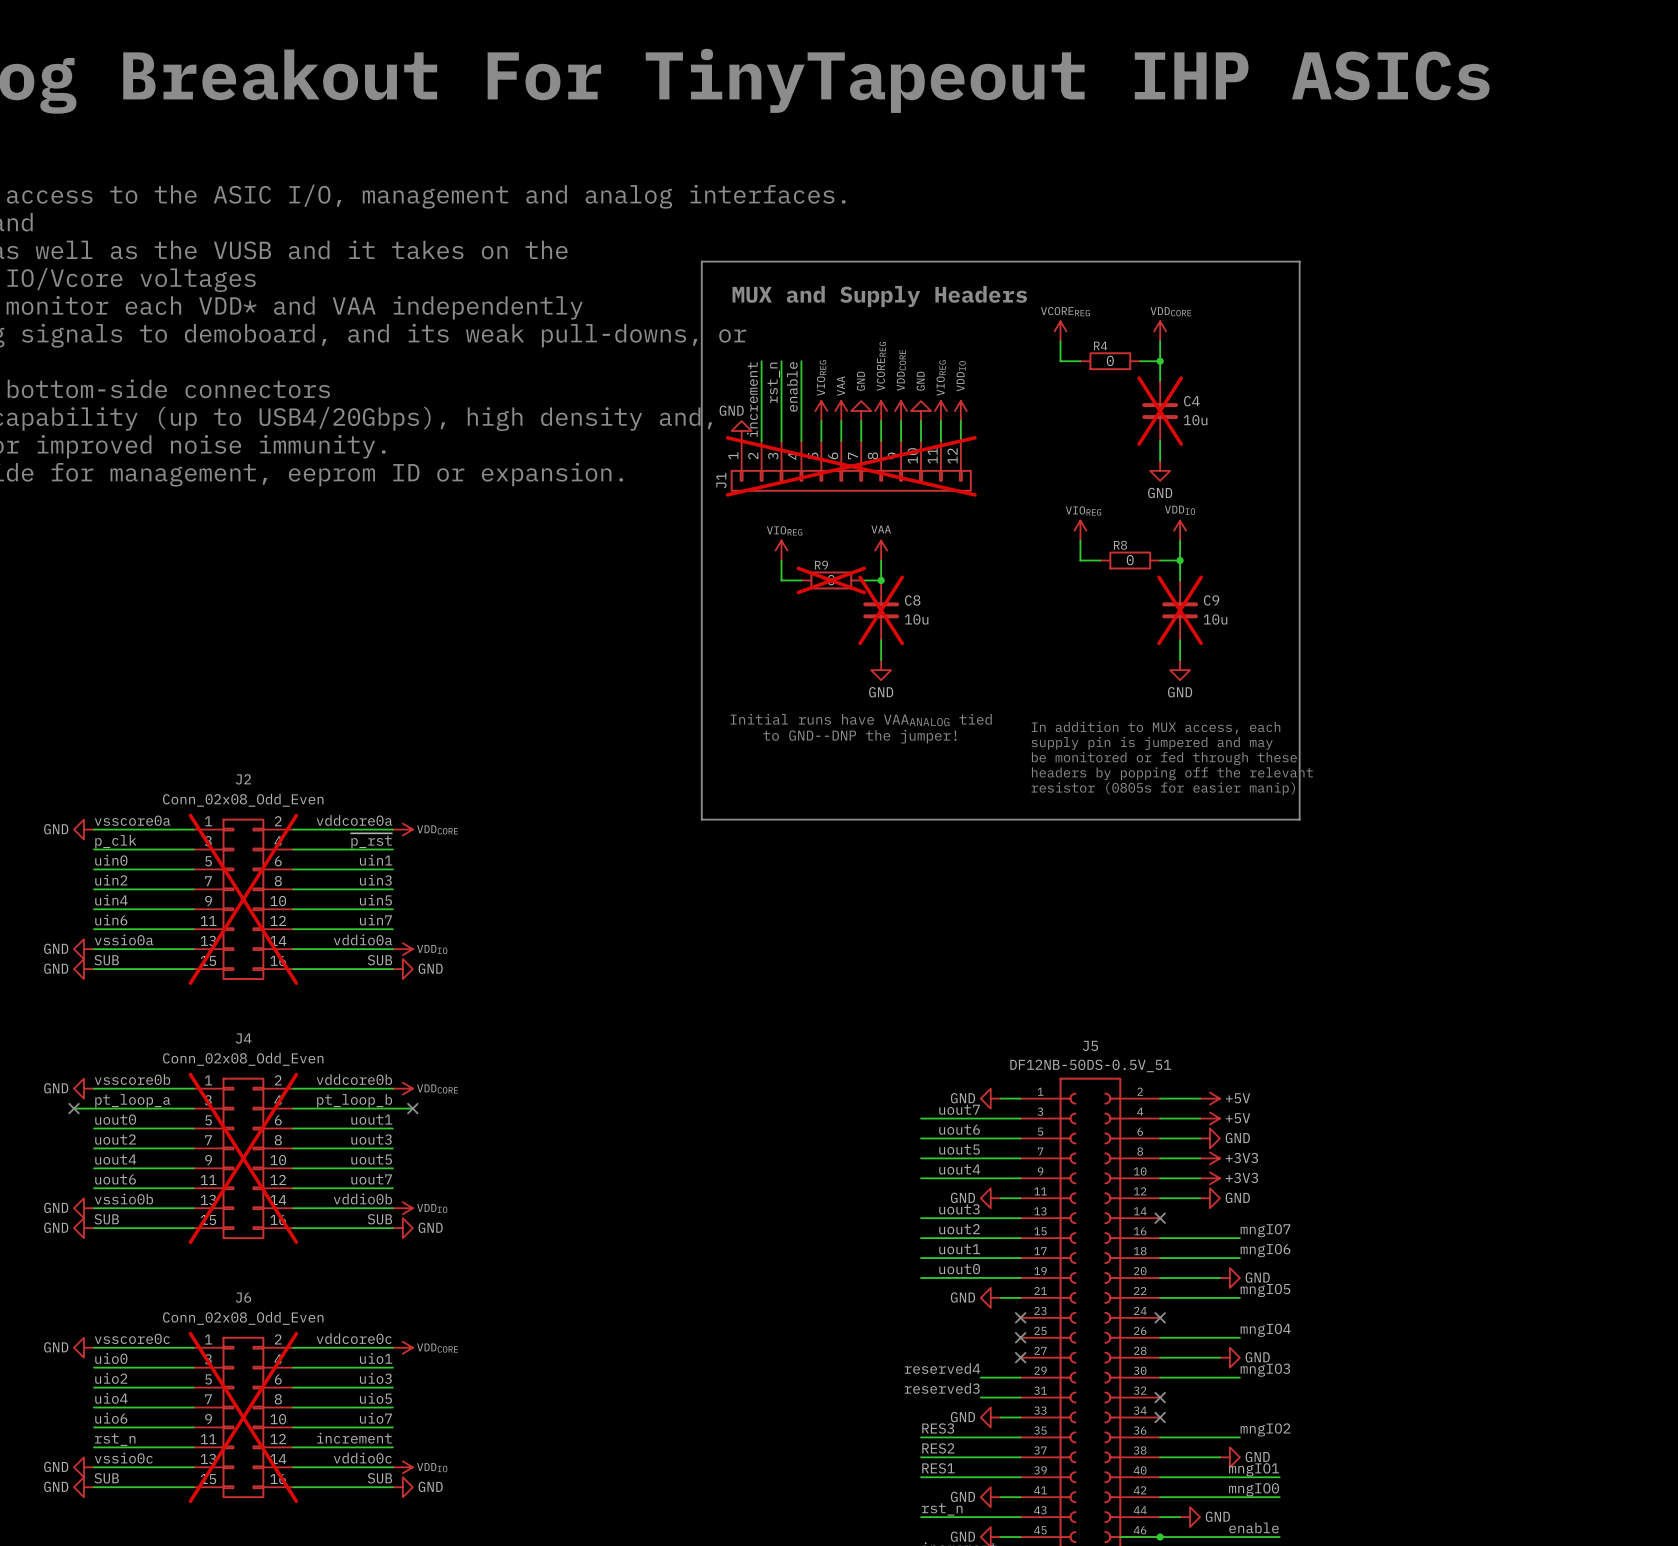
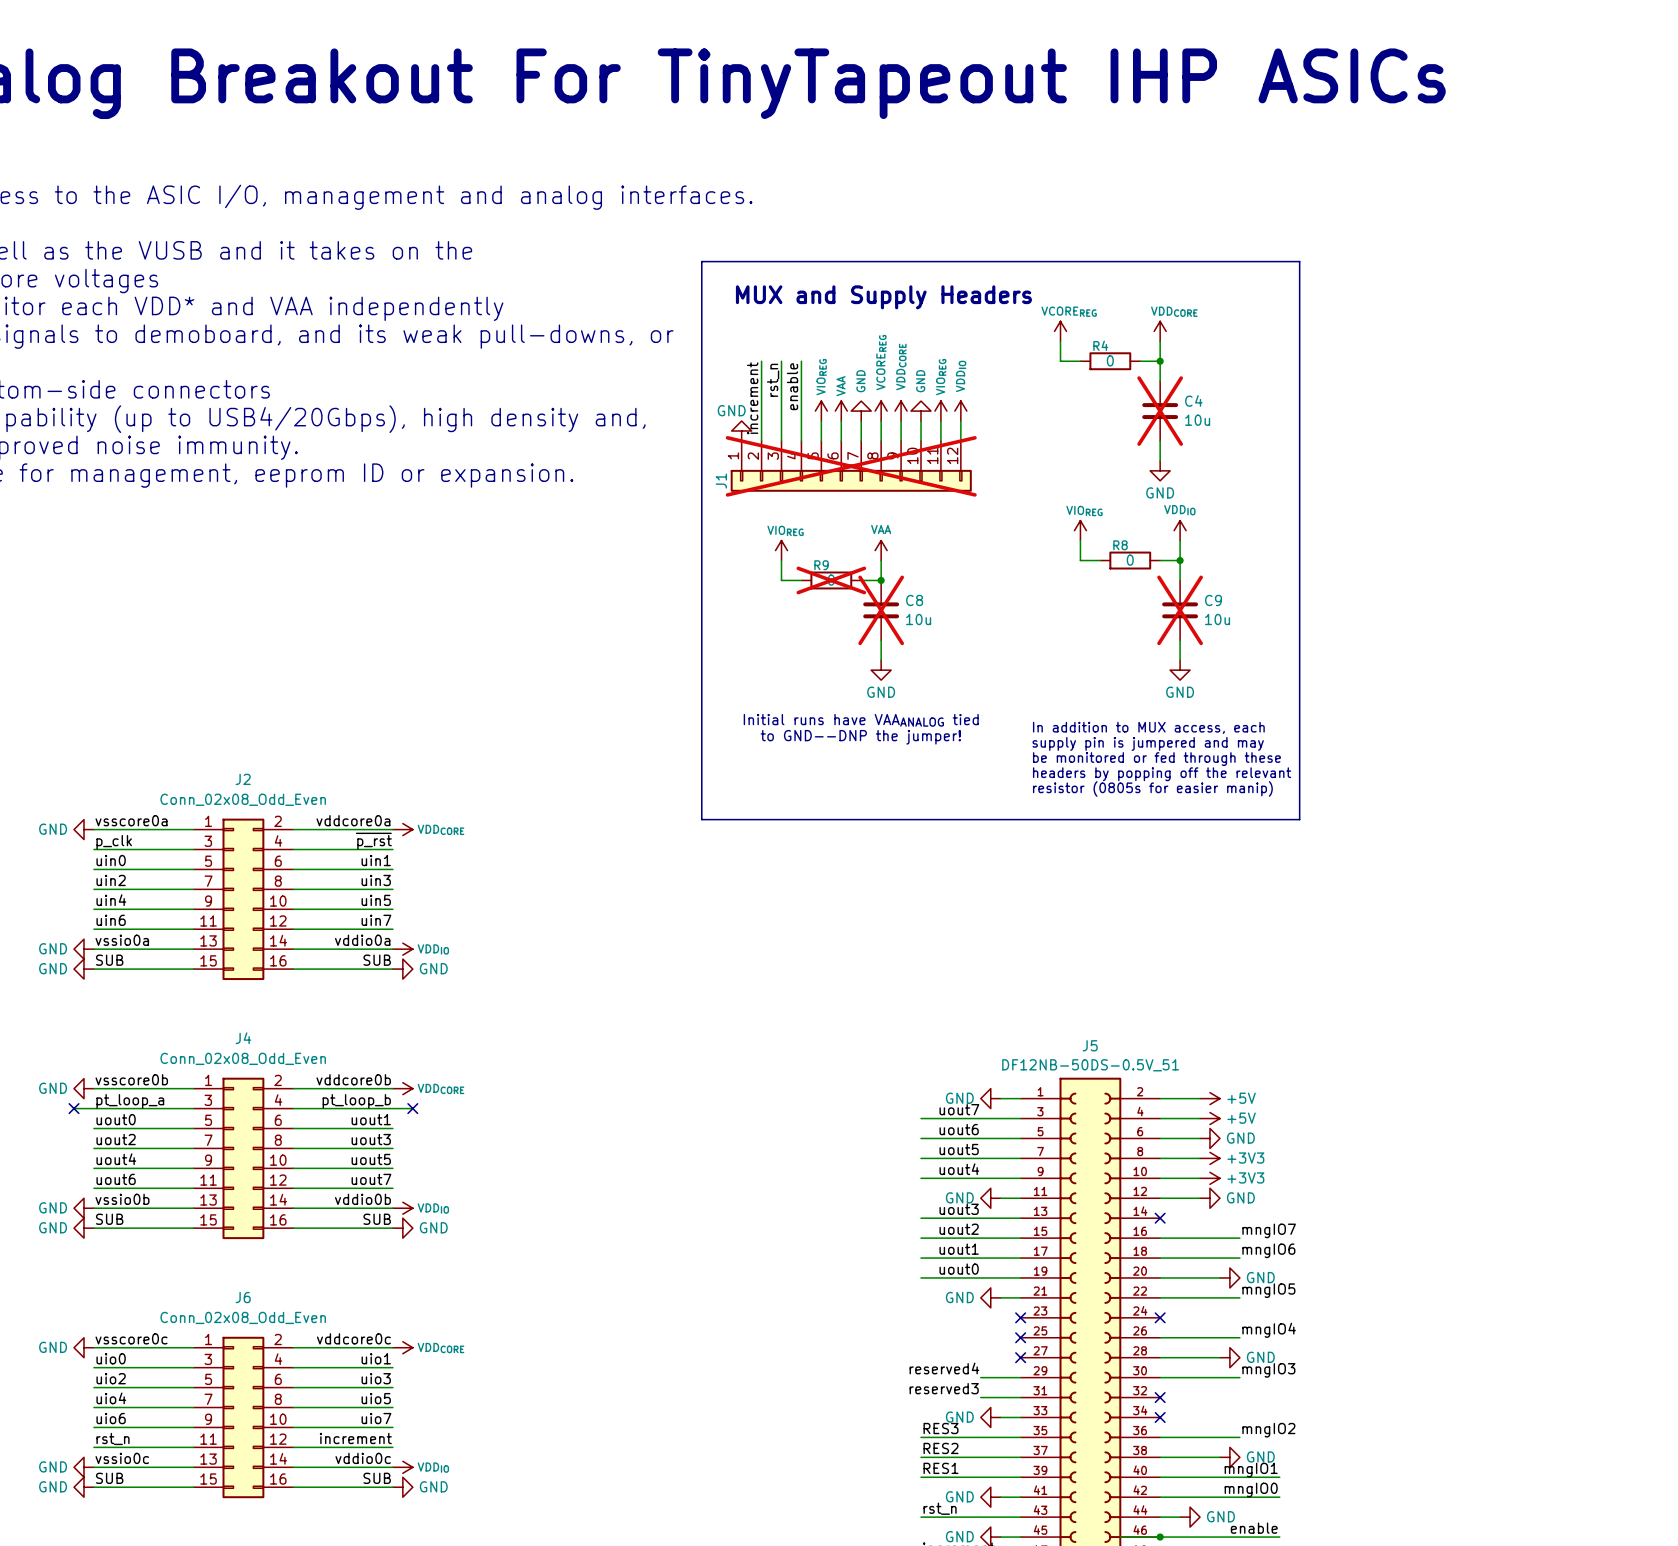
J2 do-not-place cross: (243, 899) -> none
J4 do-not-place cross: (243, 1158) -> none
J6 do-not-place cross: (243, 1417) -> none

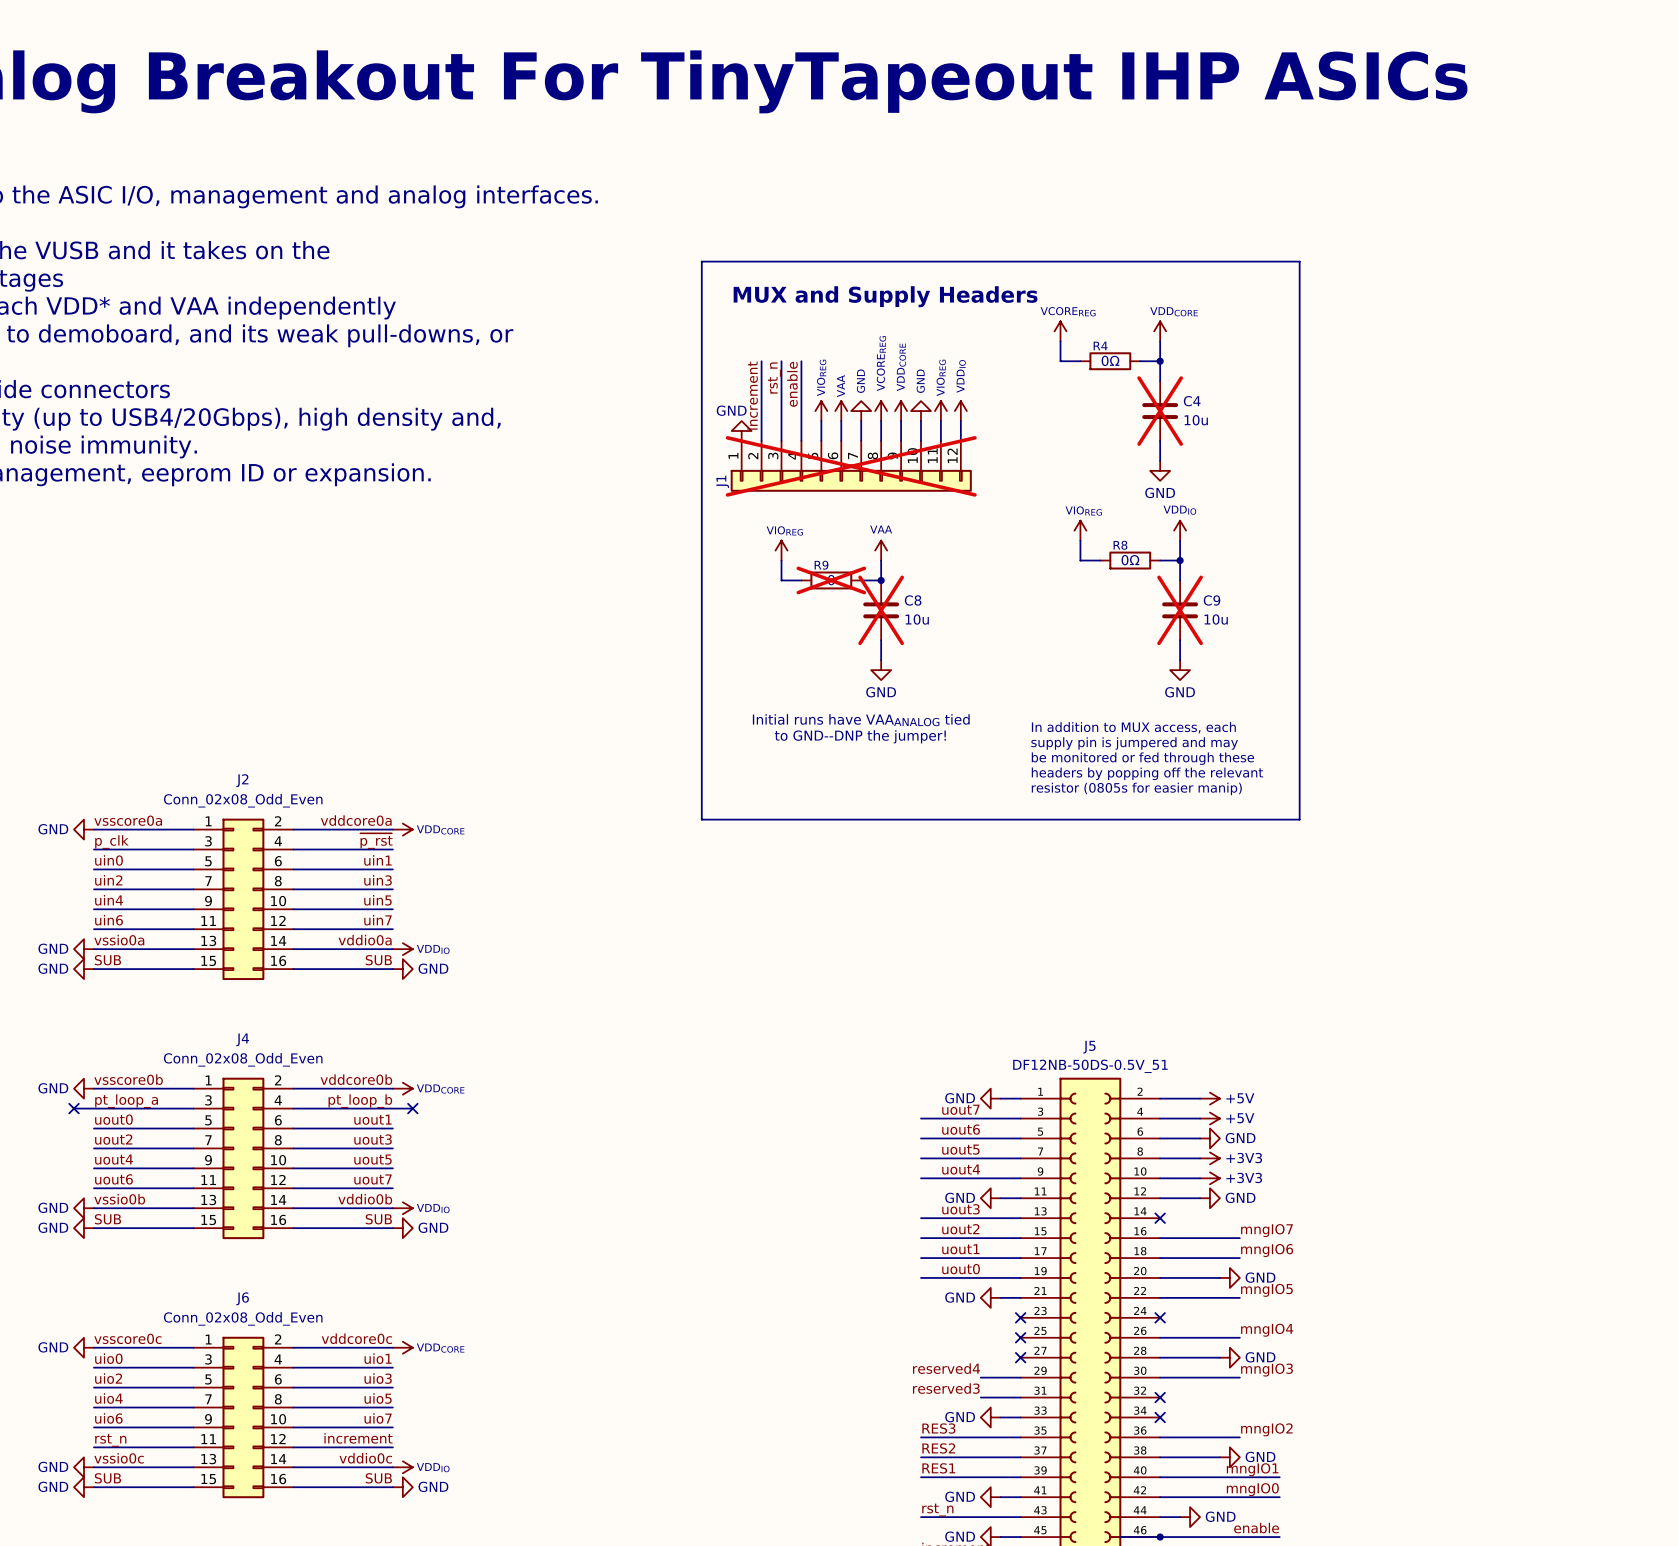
R4 value: 0 (1110, 360) -> 0Ω (1110, 360)
R8 value: 0 (1130, 560) -> 0Ω (1130, 560)

